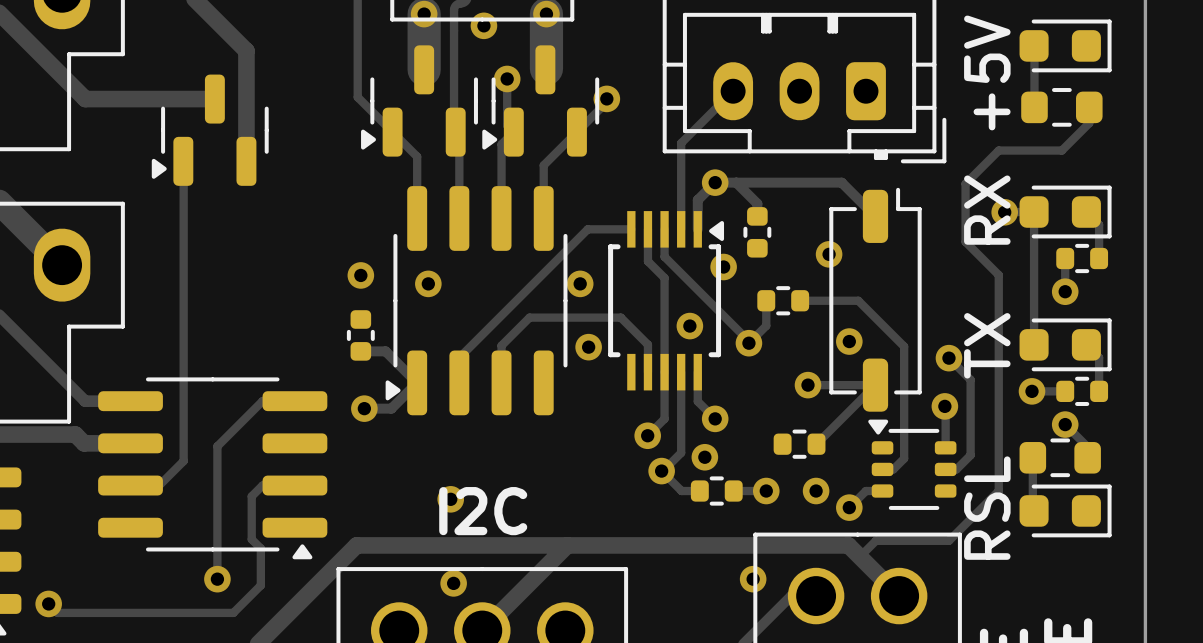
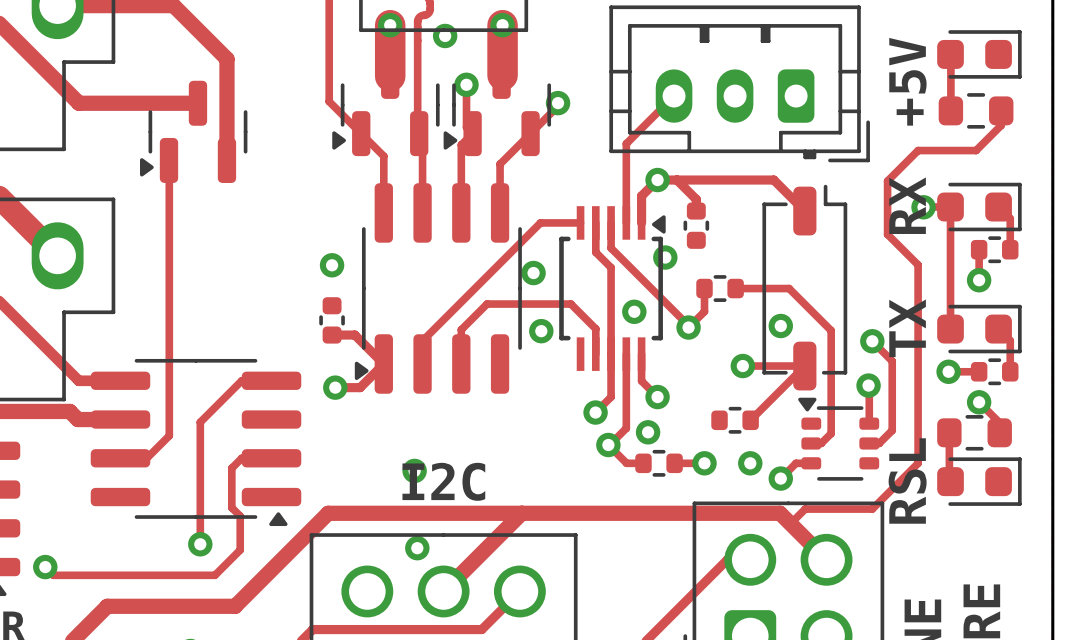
via: (829, 254) -> none
via: (428, 283) -> none
via: (753, 579) -> none

